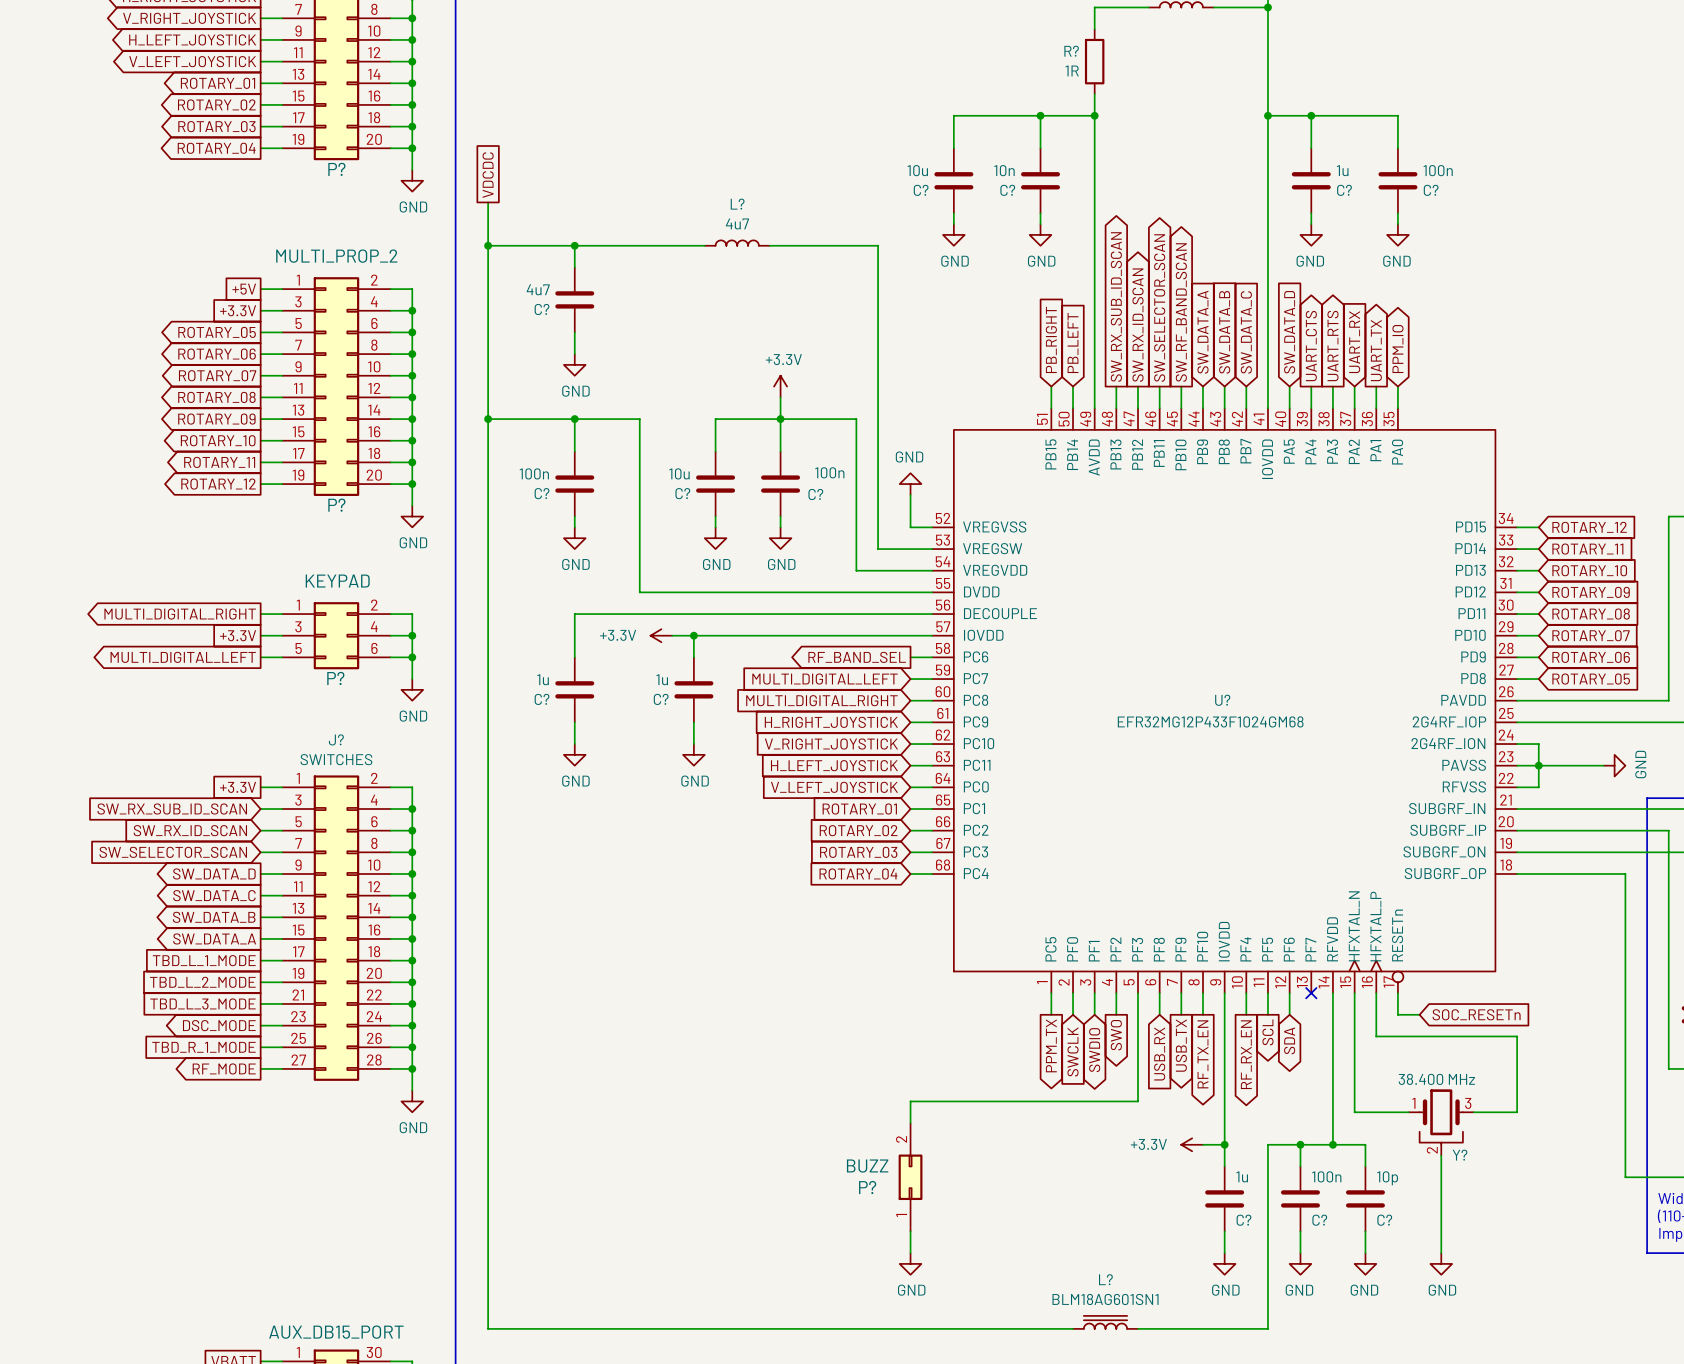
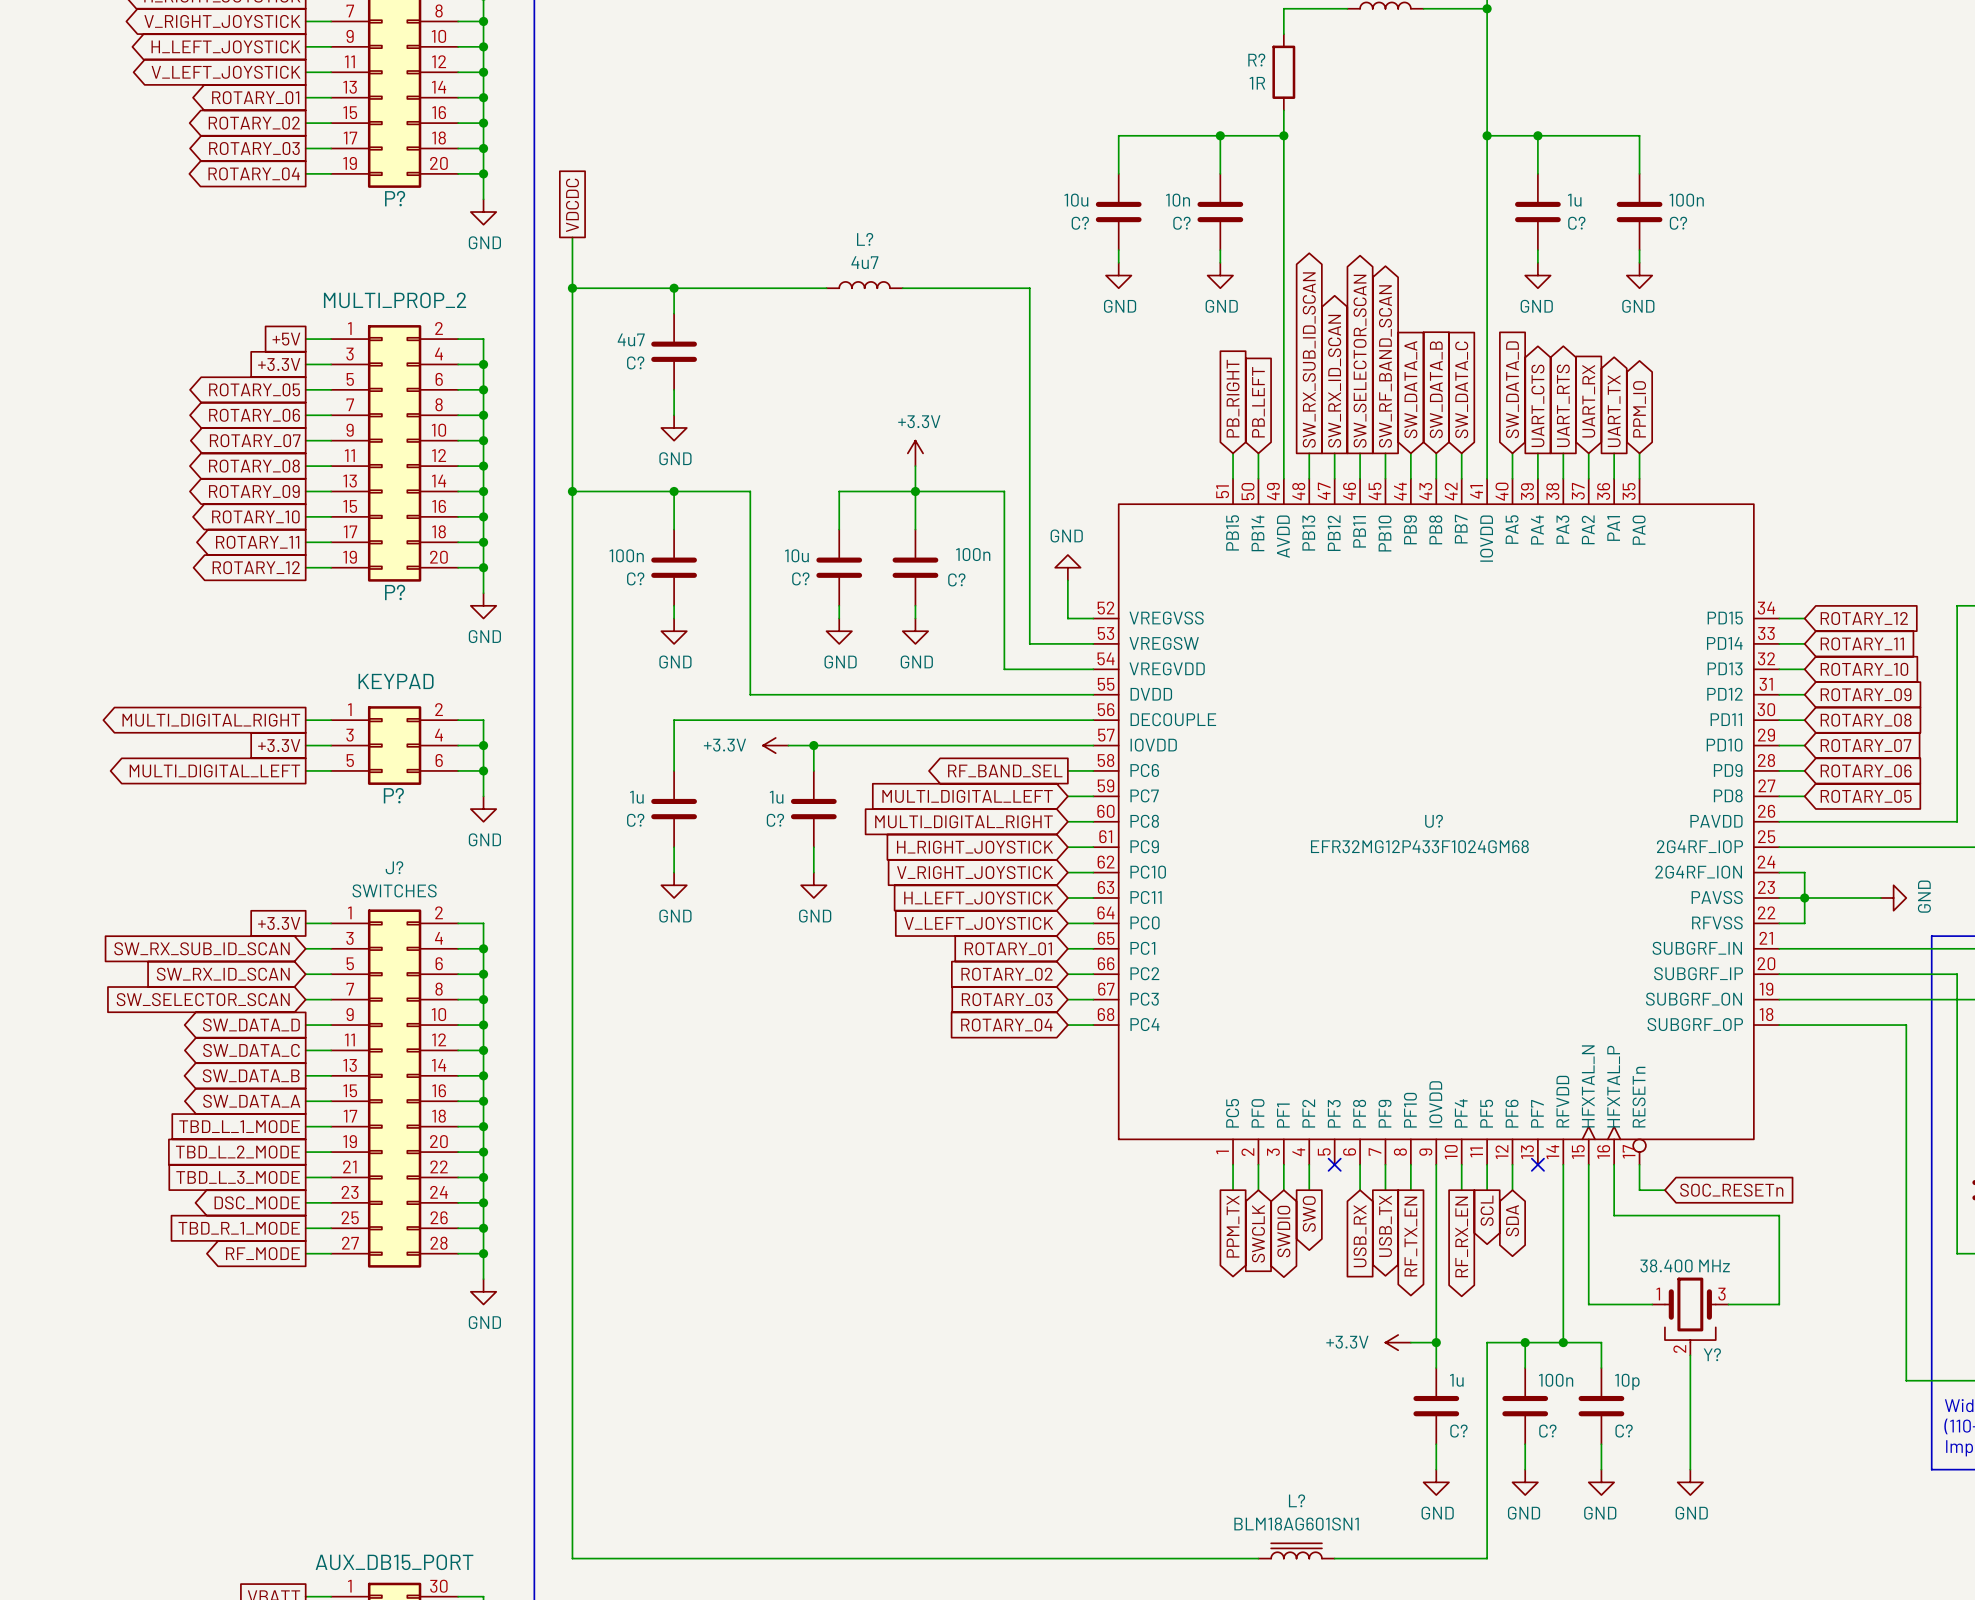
wire: (1138, 993) (1138, 1101) (910, 1101) (910, 1123) -> none
no-connect mark: none -> (1334, 1164)
P?: BUZZ (910, 1177) -> none
wire: (910, 1231) (910, 1253) -> none
power symbol: GND (910, 1263) -> none

